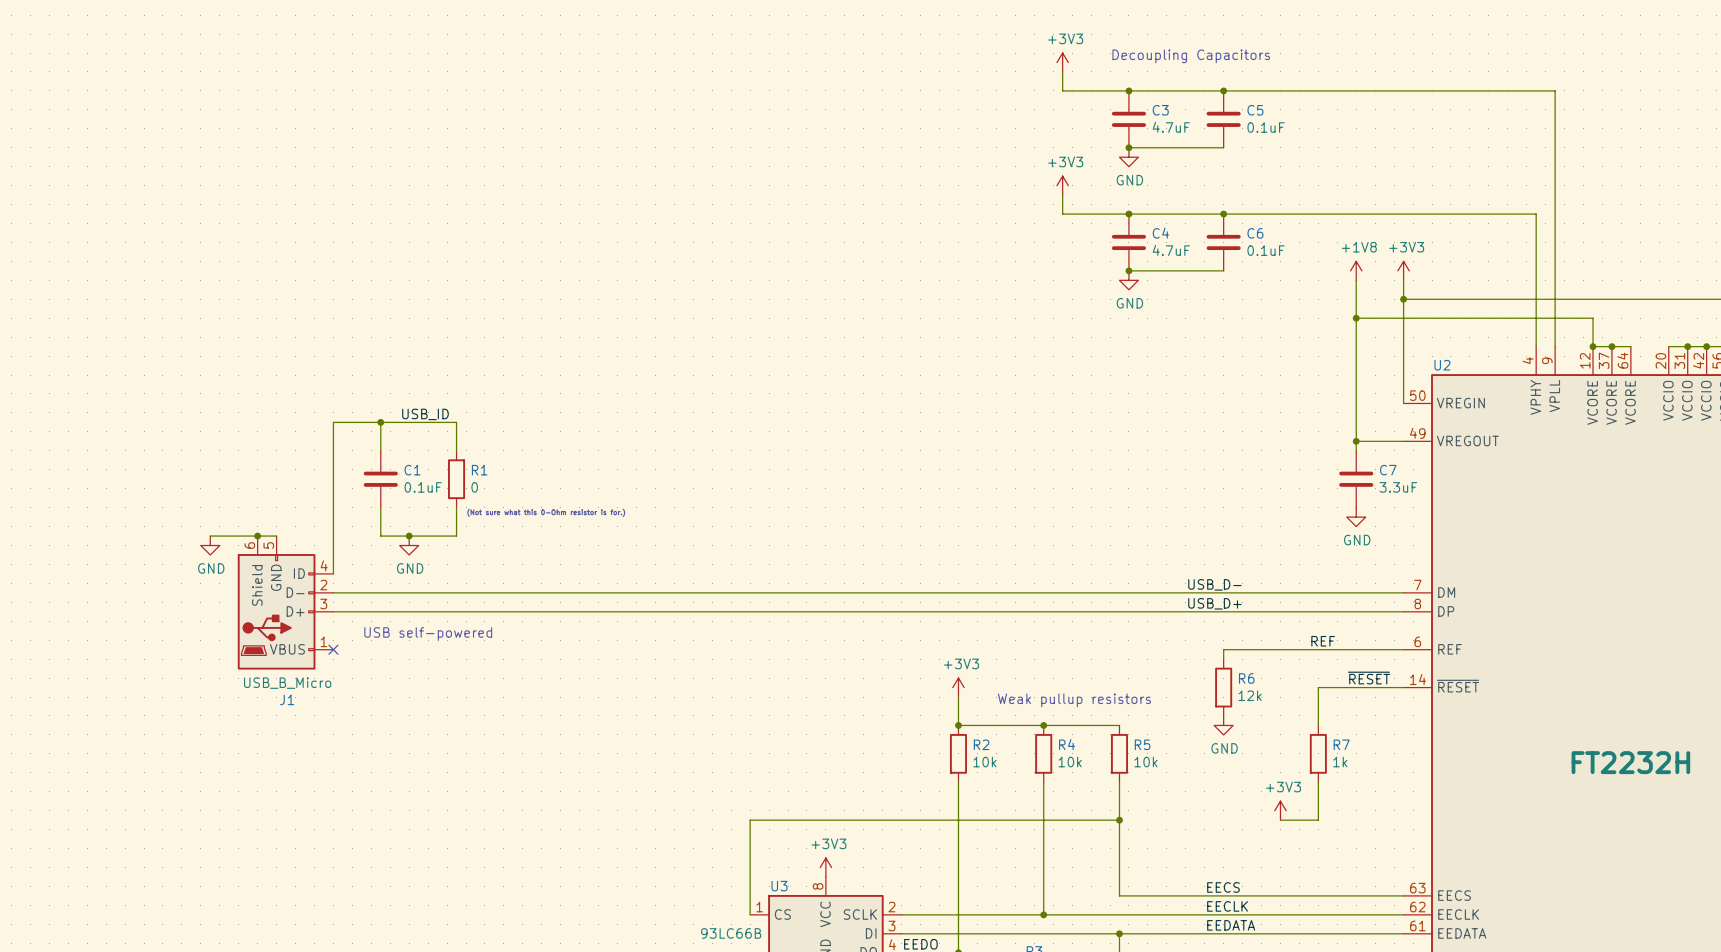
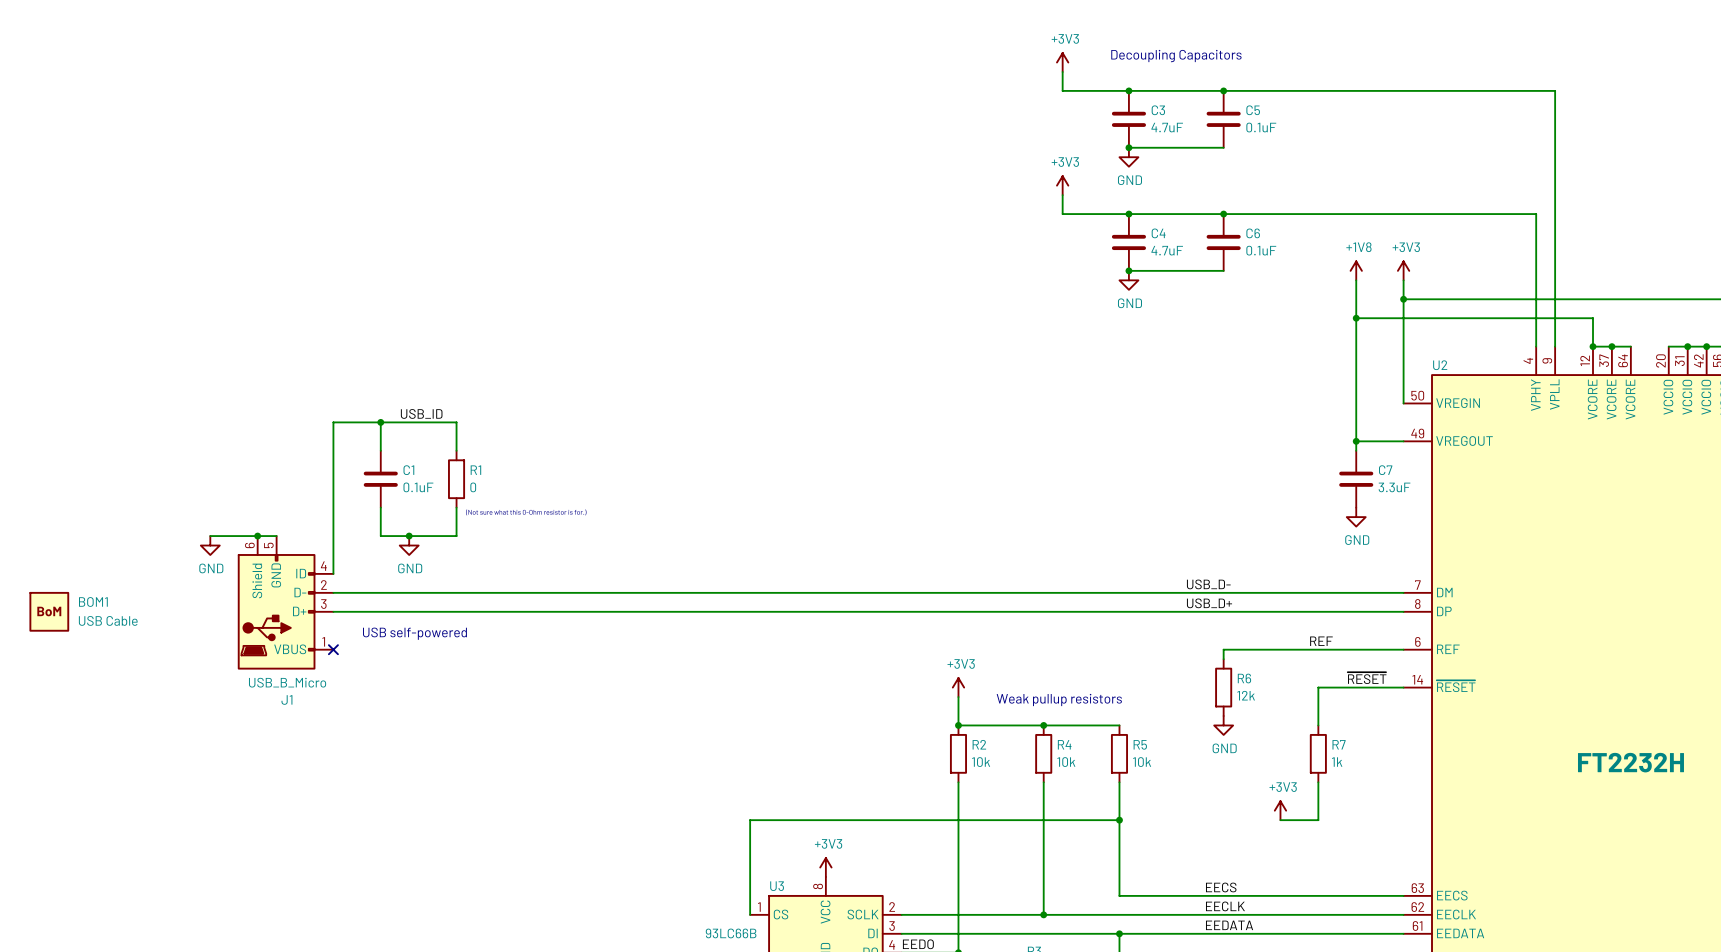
BOM1: none -> USB Cable (49, 611)

